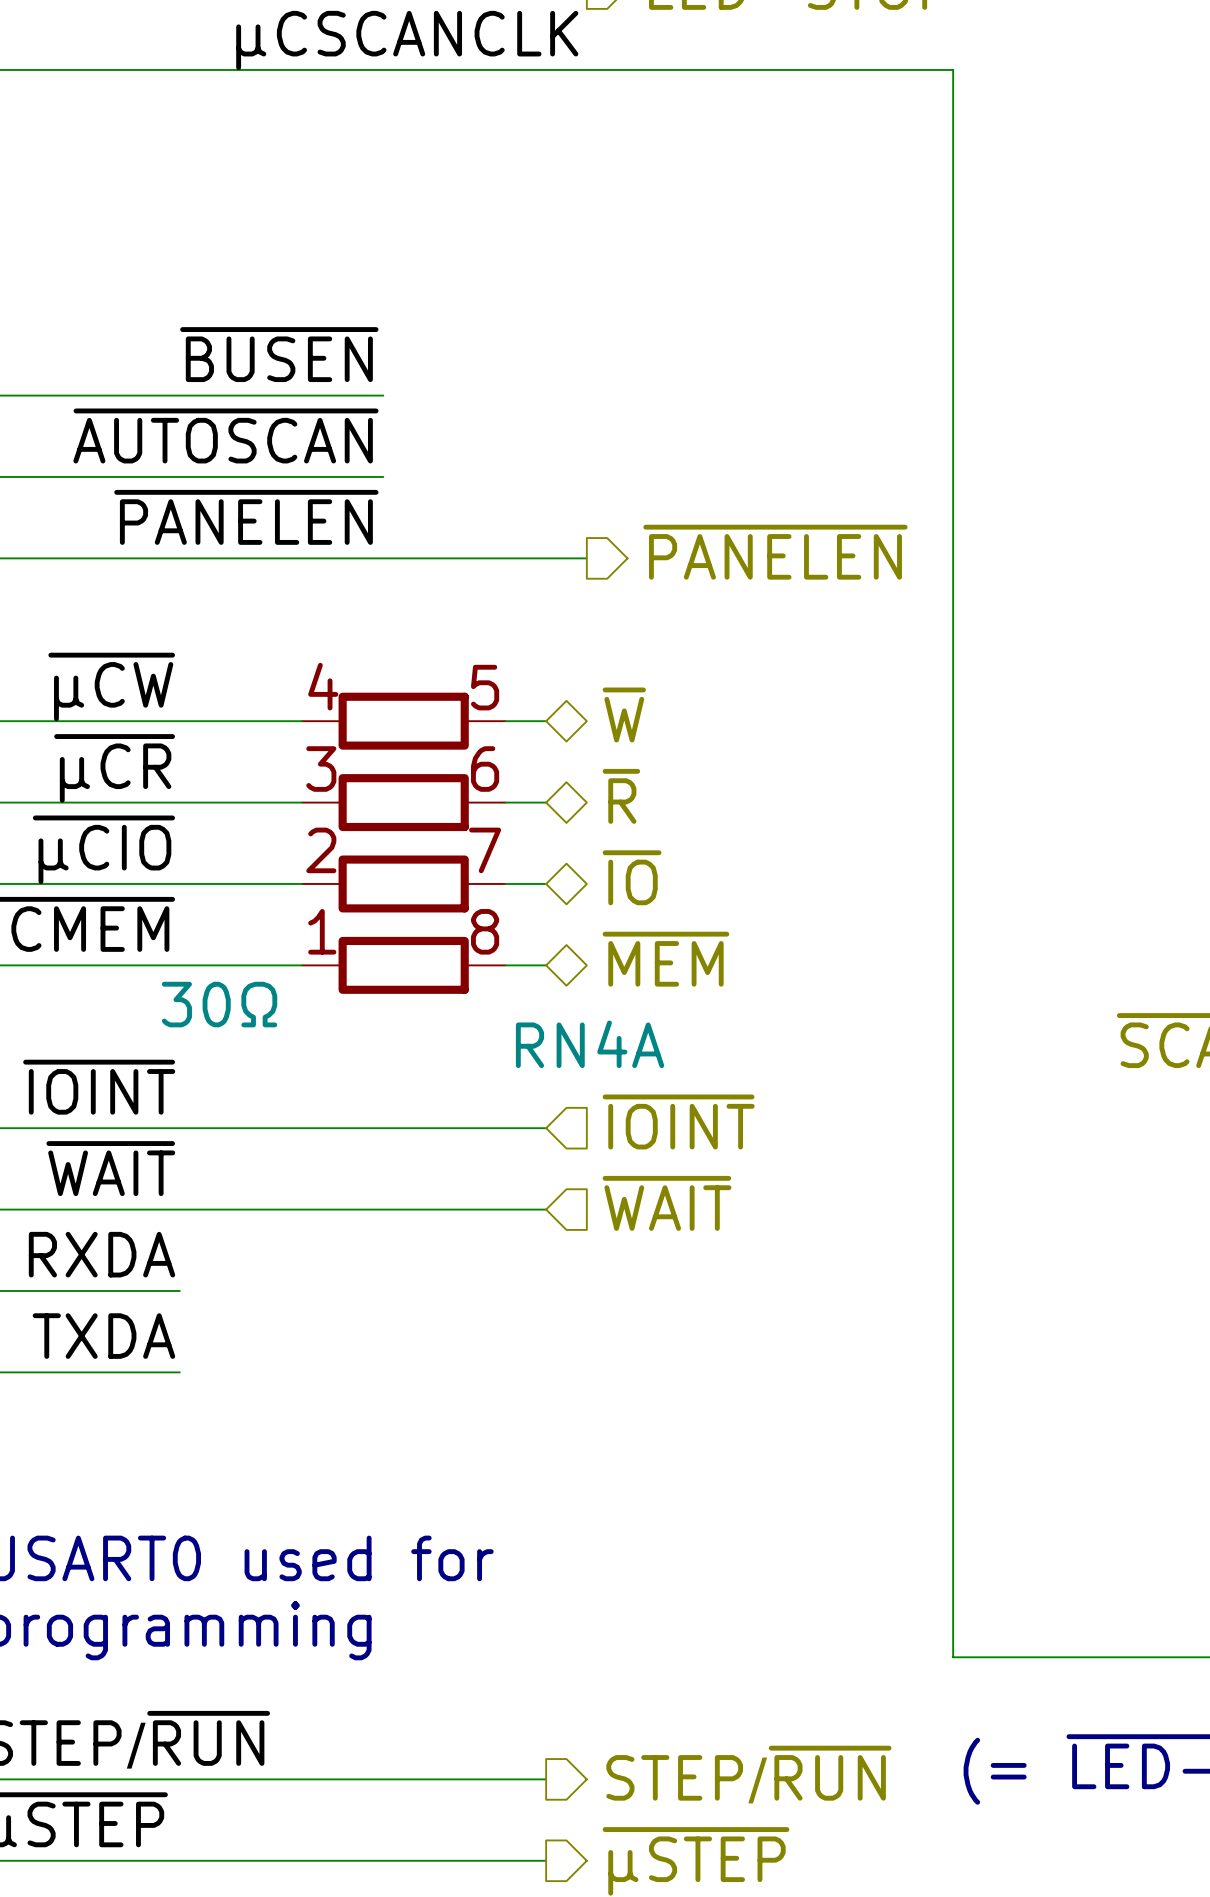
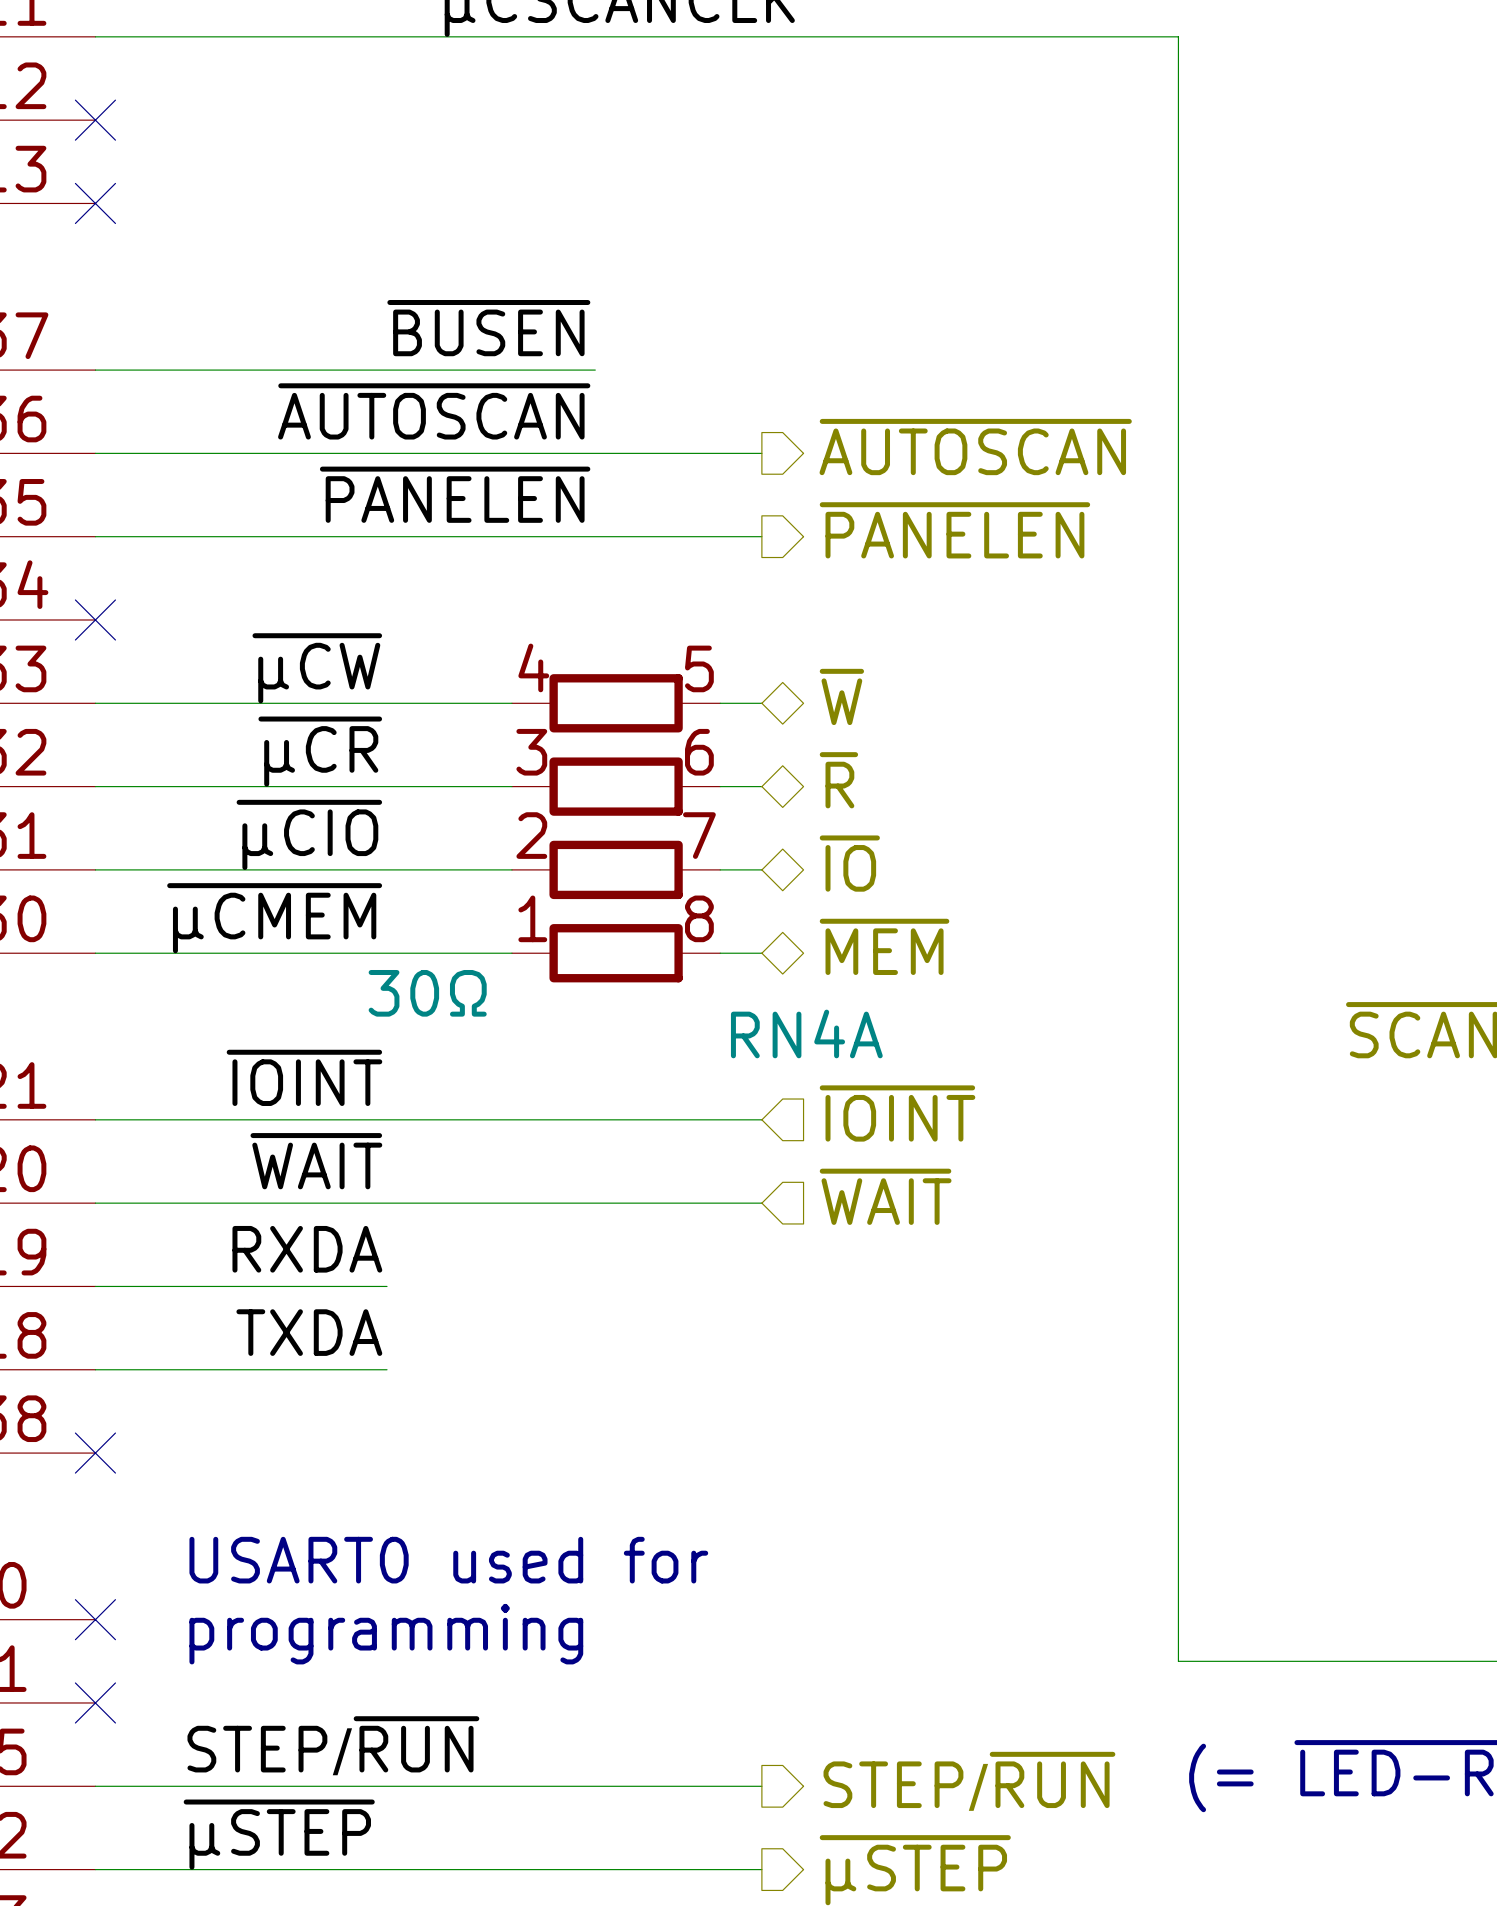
hierarchical label: none -> ~{AUTOSCAN} (975, 447)
wire: none -> (595, 453) (761, 453)
hierarchical label position: ~{PANELEN} (775, 552) -> ~{PANELEN} (954, 530)
wire: (546, 558) (586, 558) -> none

